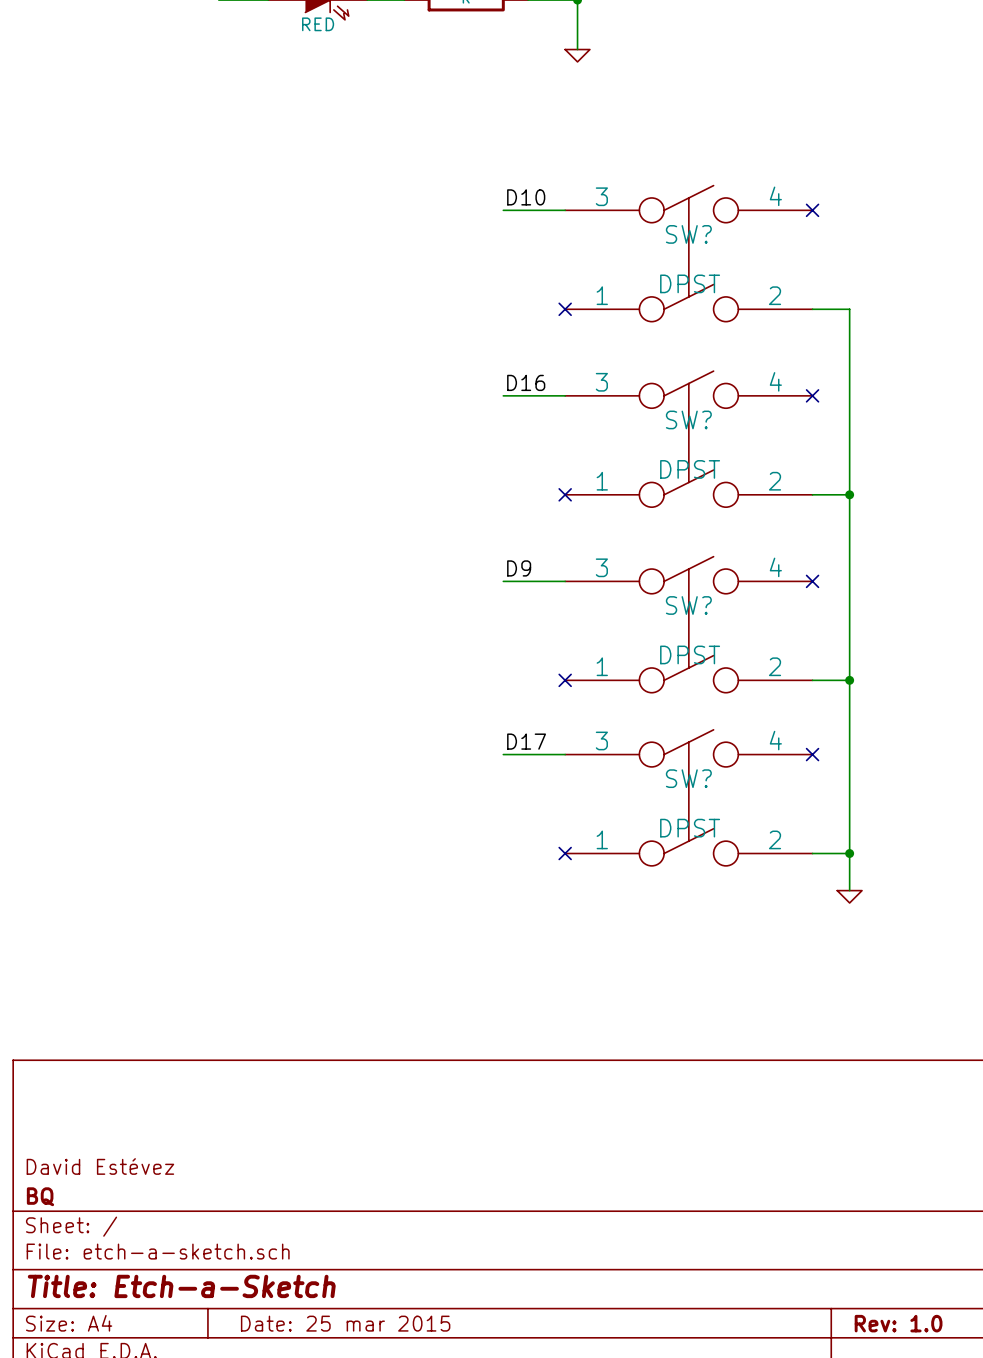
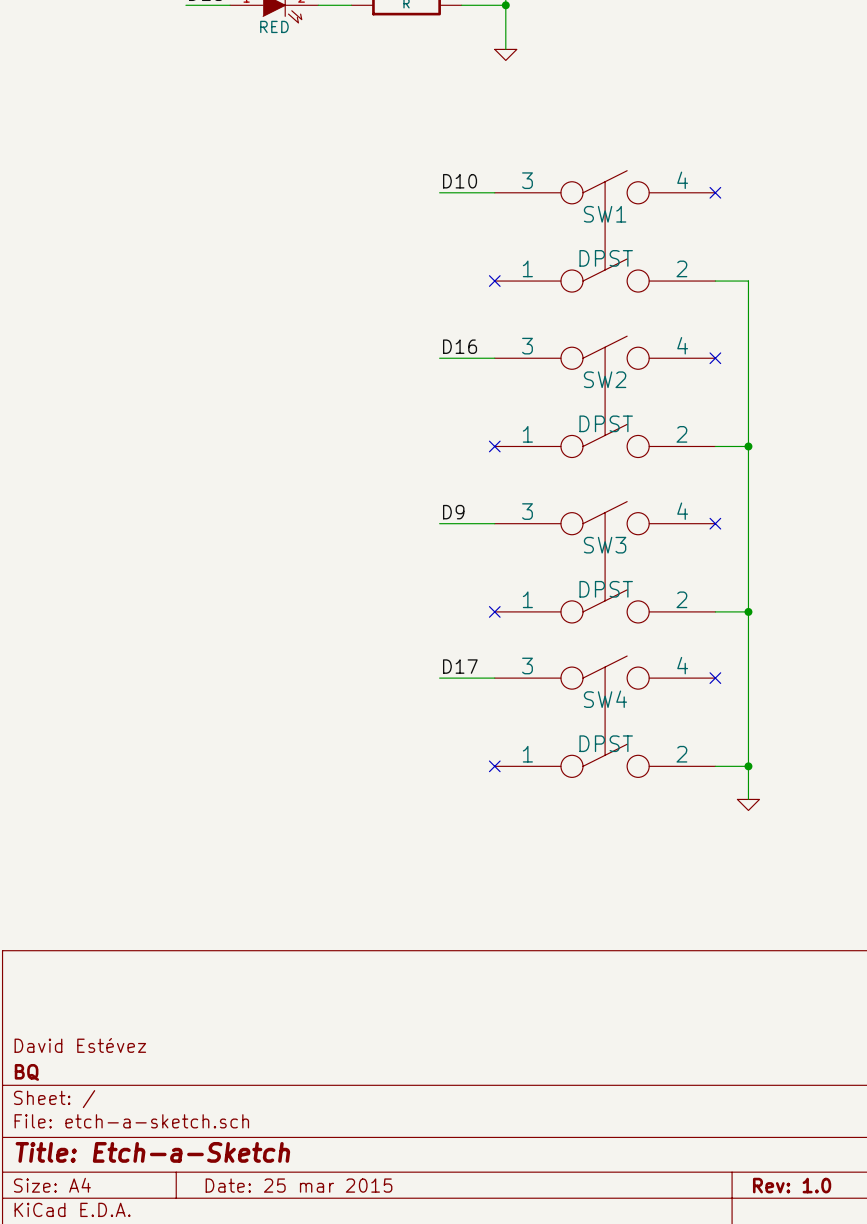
SW? name: SW? (688, 234) -> SW1 (605, 214)
SW? name: SW? (688, 419) -> SW2 (605, 379)
SW? name: SW? (688, 605) -> SW3 (605, 545)
SW? name: SW? (688, 778) -> SW4 (605, 699)

